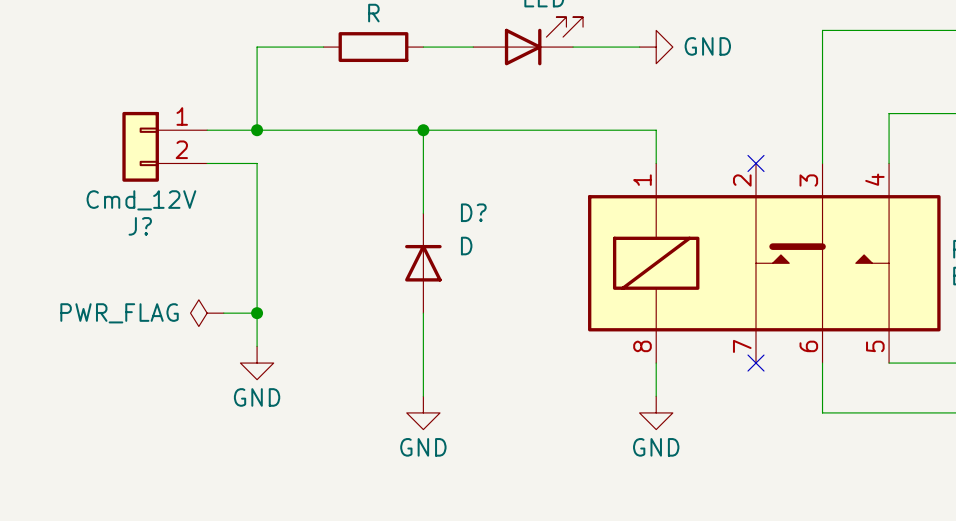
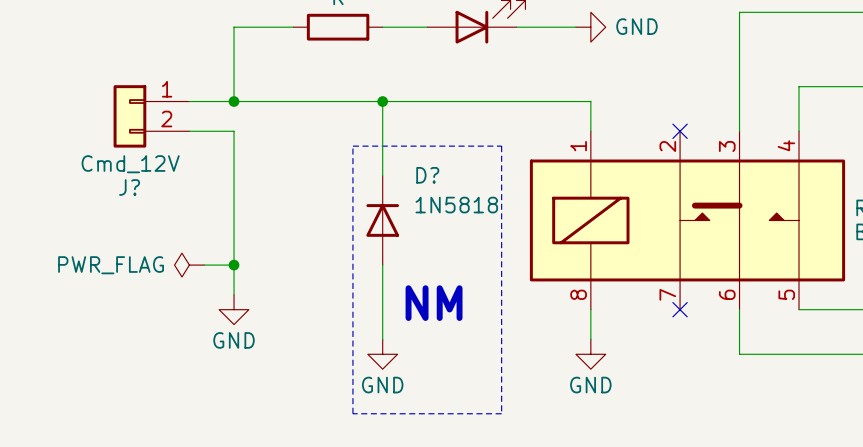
line: none -> (352, 146) (501, 146) (501, 413) (352, 413) (352, 146)
D? value: D (466, 246) -> 1N5818 (456, 205)
text: none -> NM (434, 303)

